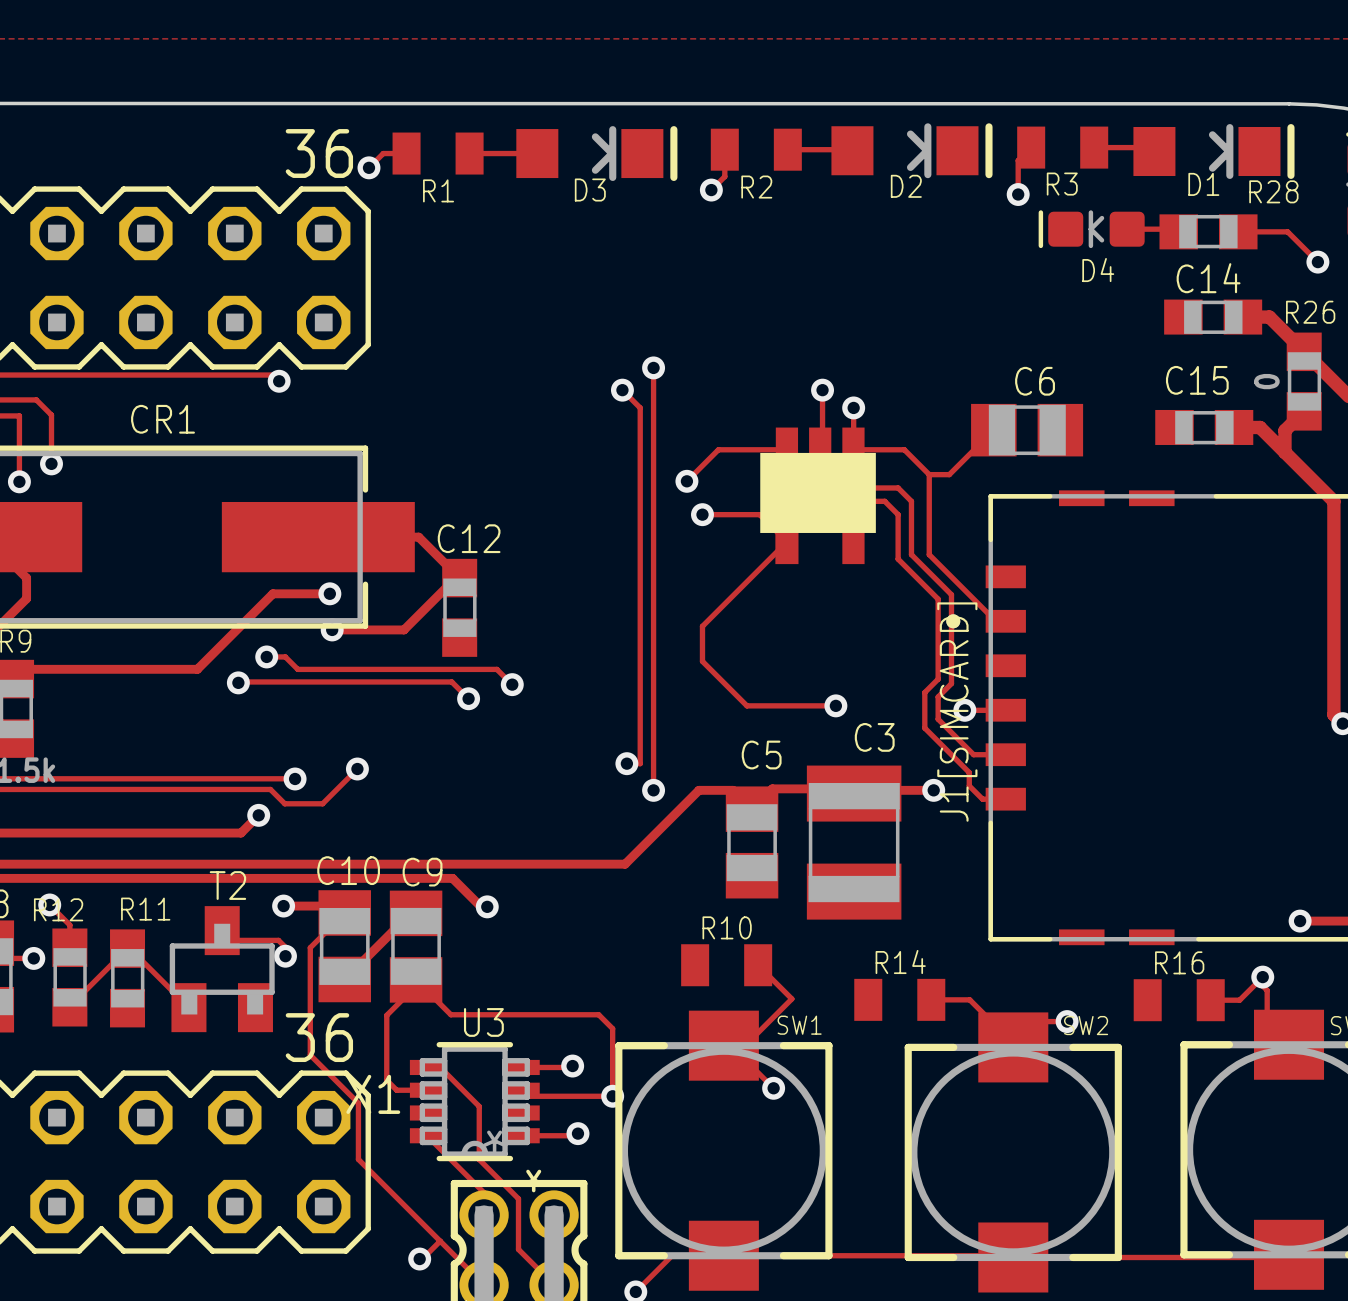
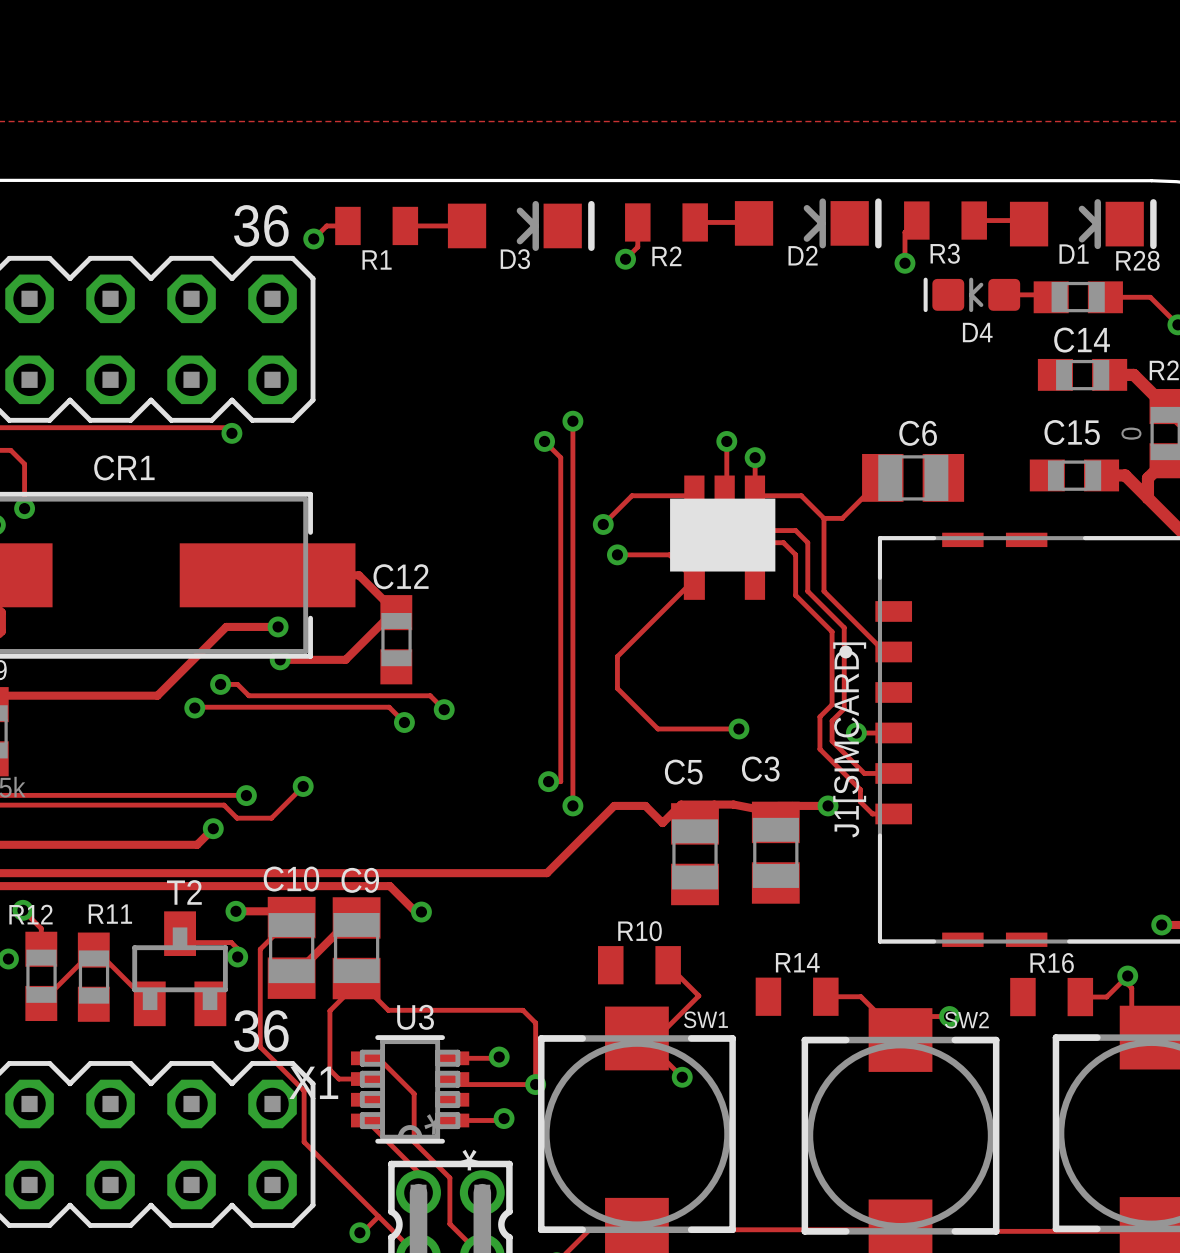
C5 name position: C5 (761, 755) -> C5 (683, 772)
C3 footprint: [806, 765, 902, 920] -> [751, 801, 800, 904]
C5 position: (752, 842) -> (695, 854)

